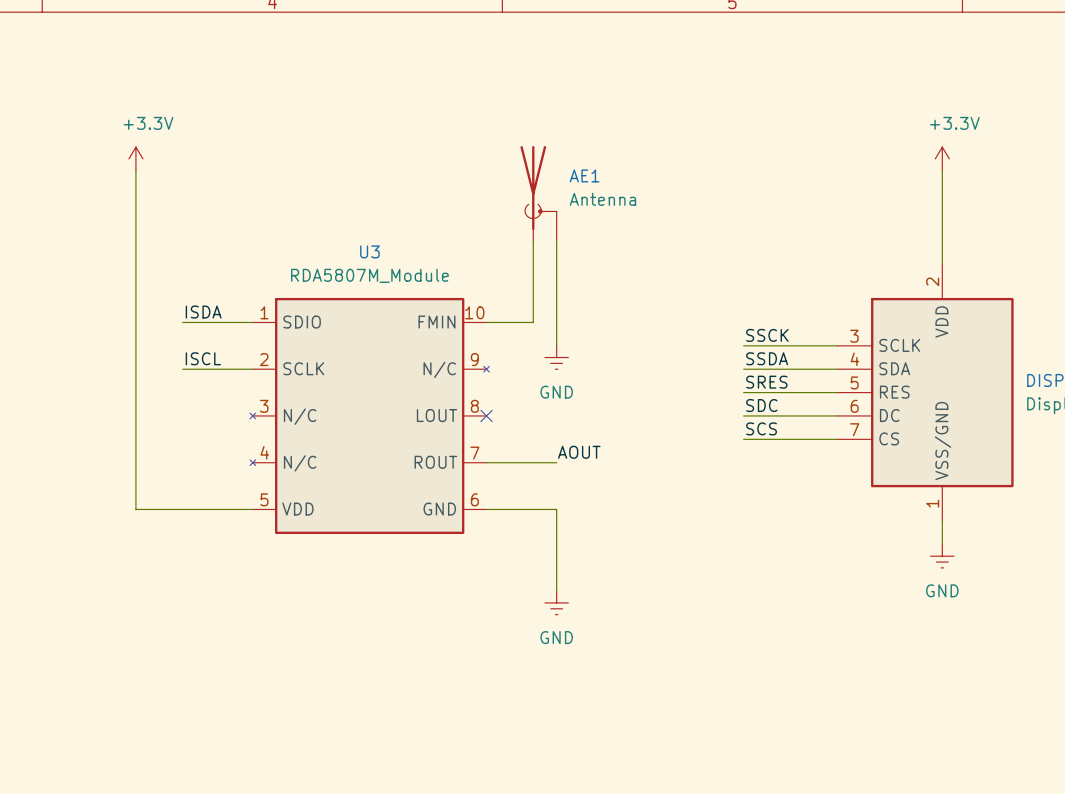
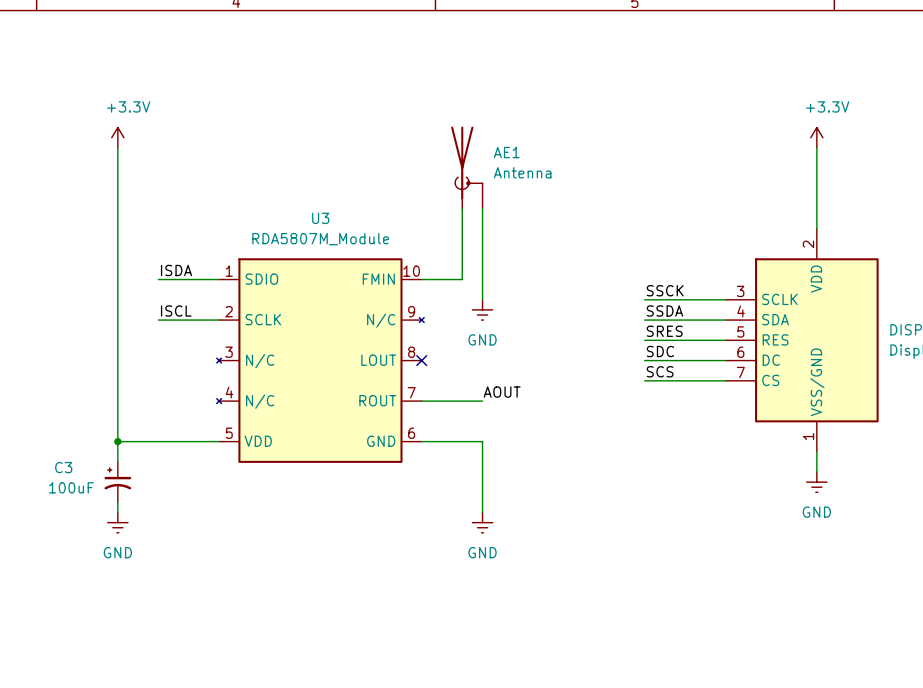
wire: none -> (117, 441) (117, 461)
junction: none -> (117, 441)
C3: none -> 100uF (117, 482)
wire: none -> (117, 502) (117, 512)
power symbol: none -> GND (117, 522)

